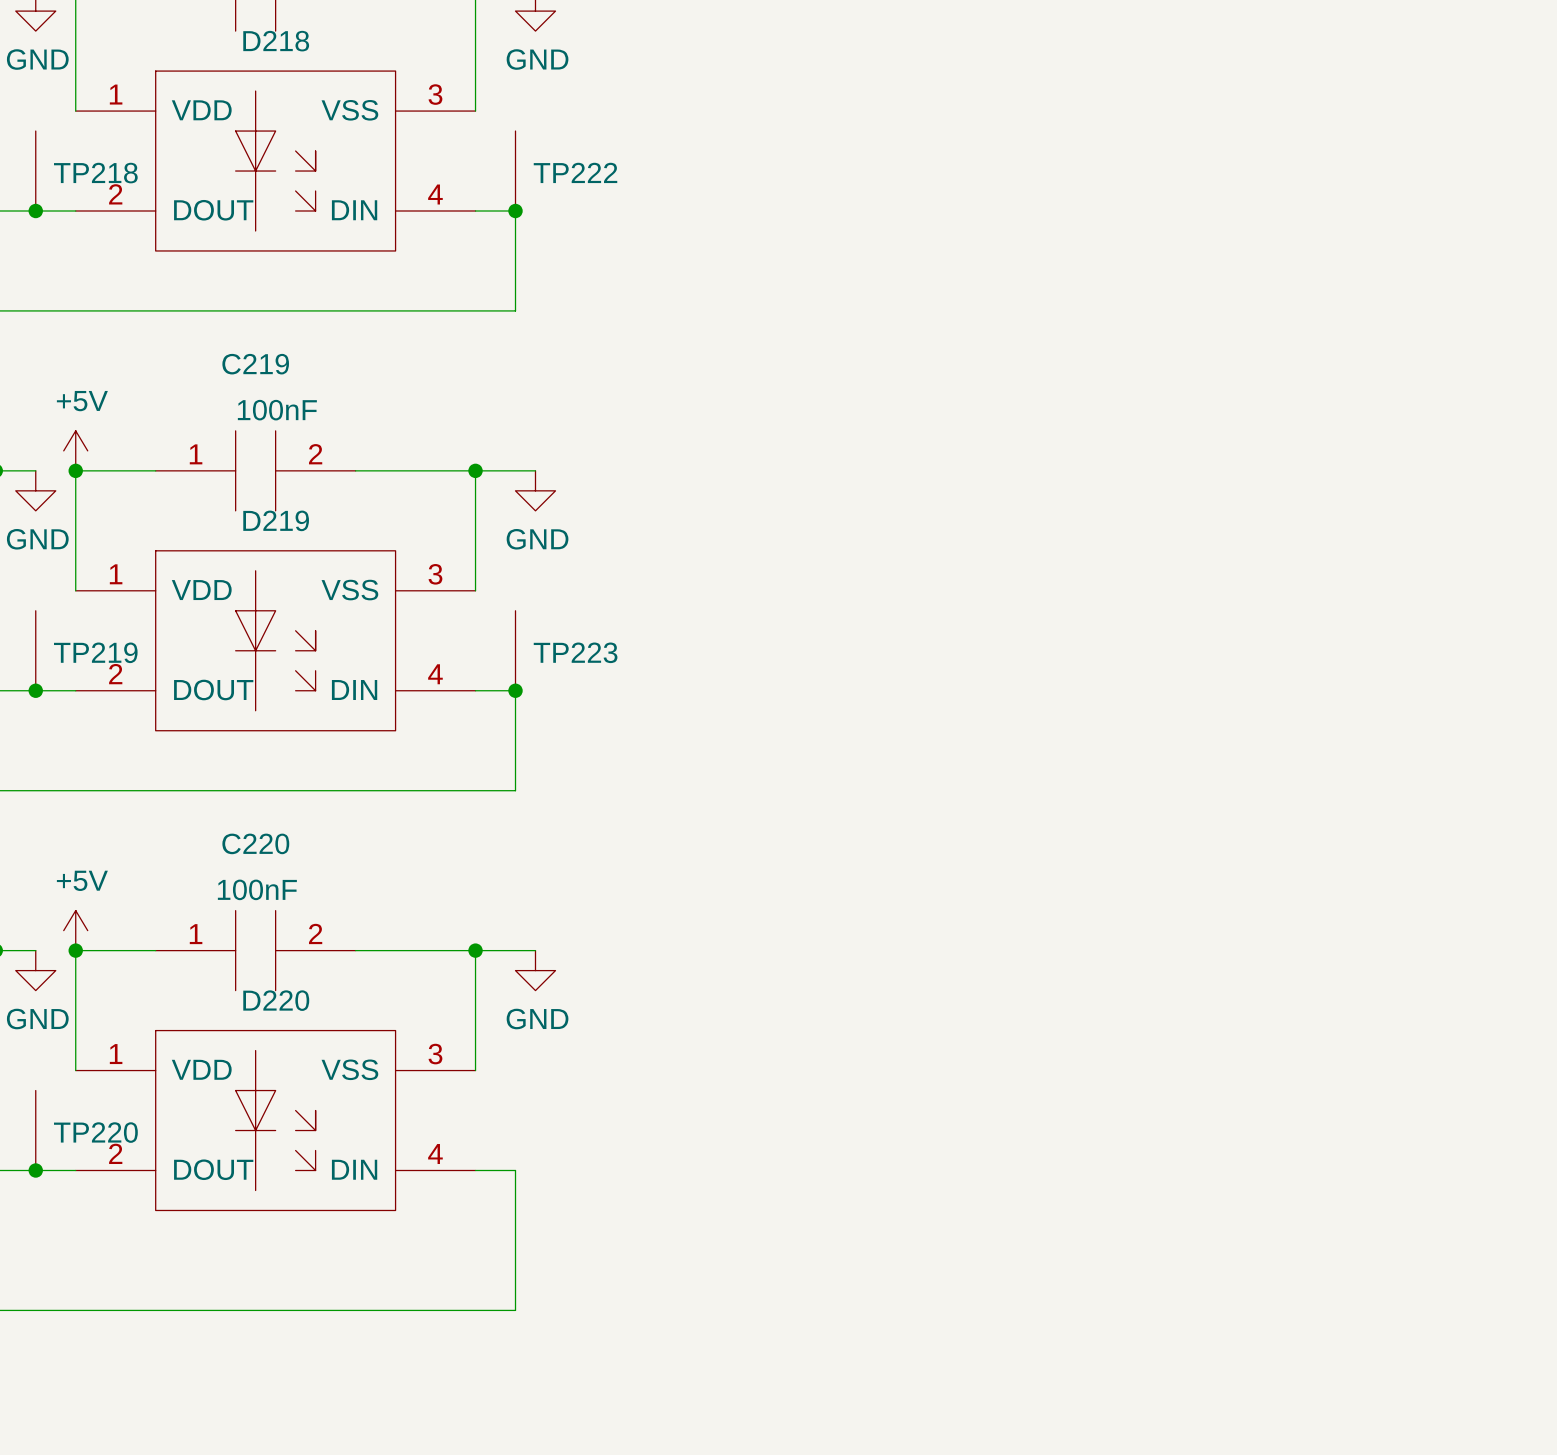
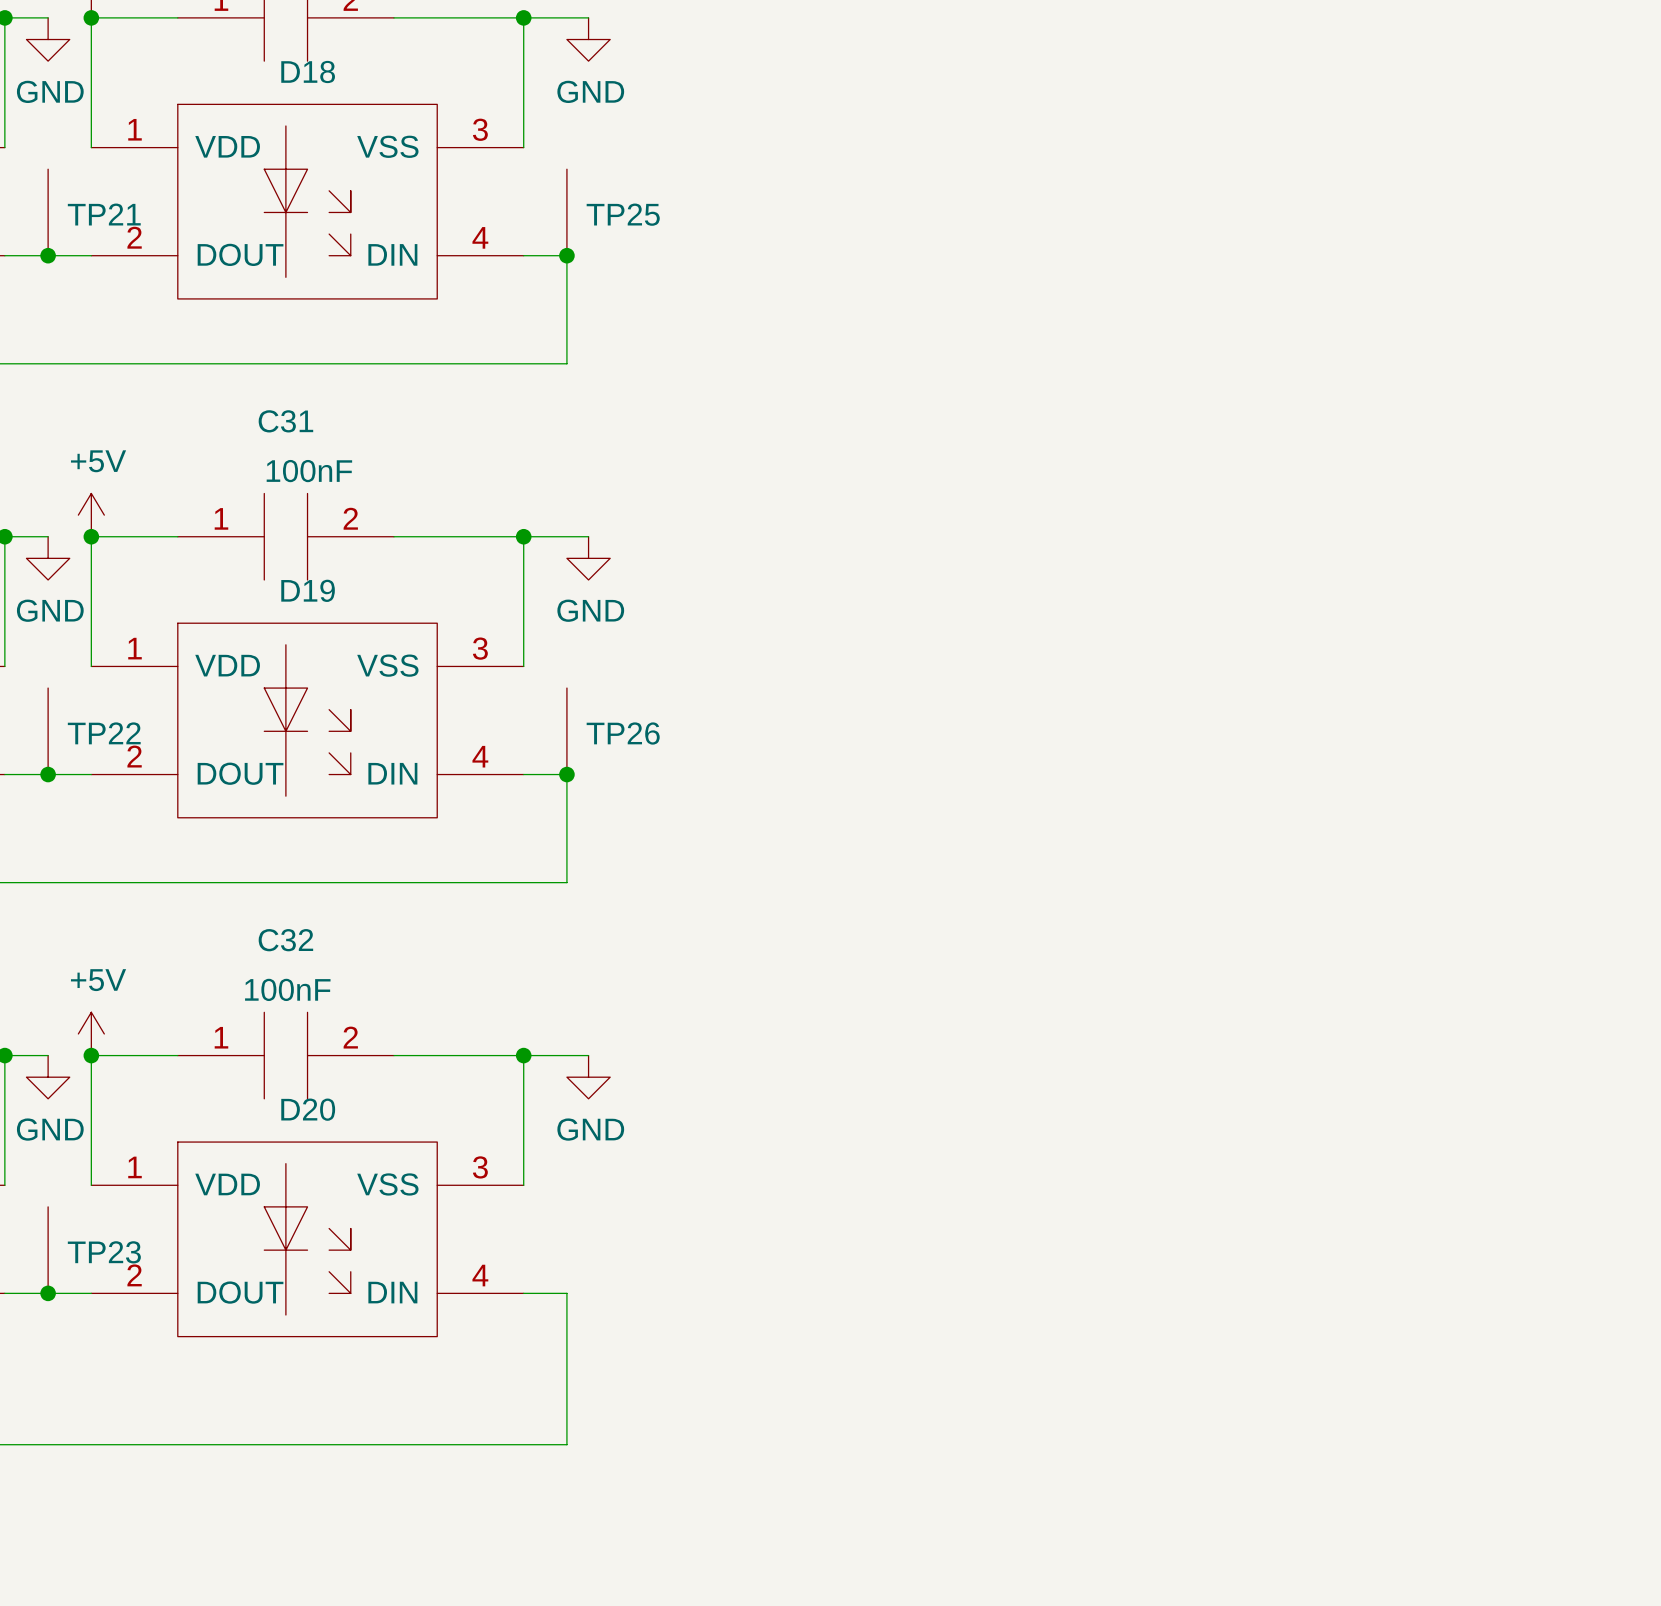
D218 name: D218 (276, 41) -> D18 (308, 71)
TP222 name: TP222 (575, 172) -> TP25 (623, 214)
TP218 name: TP218 (95, 173) -> TP21 (104, 214)
C219 name: C219 (255, 364) -> C31 (285, 421)
D219 name: D219 (276, 520) -> D19 (308, 590)
TP219 name: TP219 (95, 652) -> TP22 (104, 733)
TP223 name: TP223 (575, 652) -> TP26 (623, 733)
C220 name: C220 (255, 843) -> C32 (285, 940)
D220 name: D220 (276, 1000) -> D20 (308, 1109)
TP220 name: TP220 (95, 1132) -> TP23 (104, 1252)

